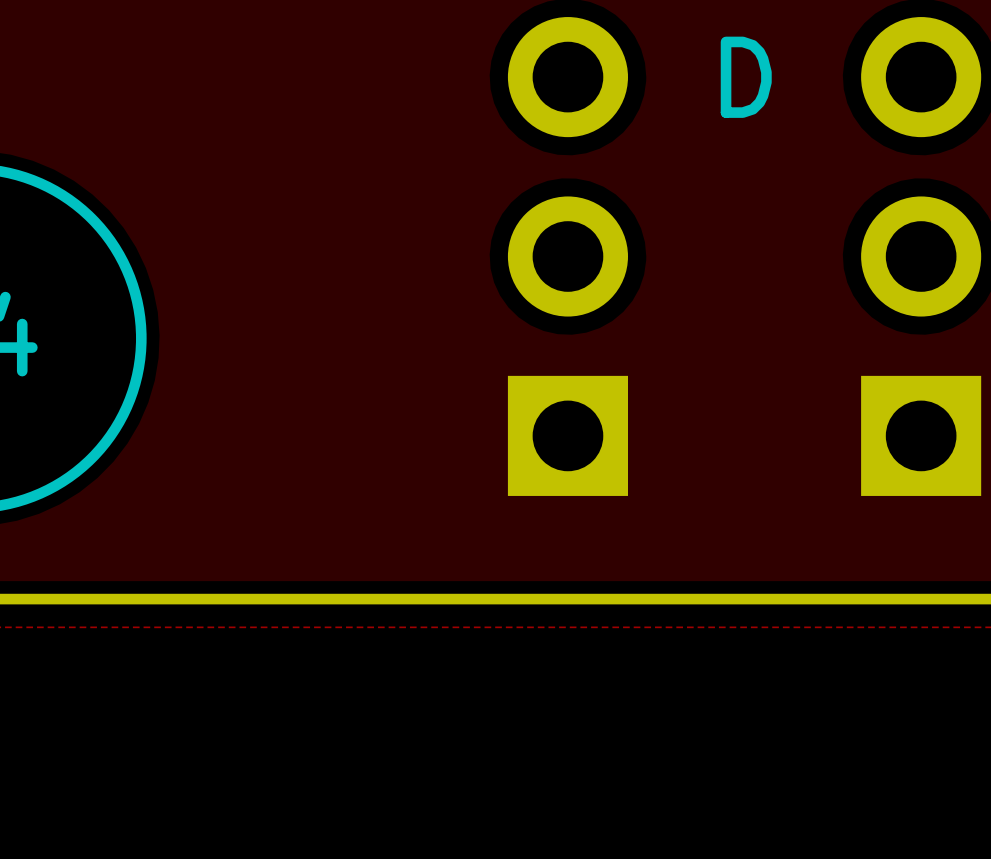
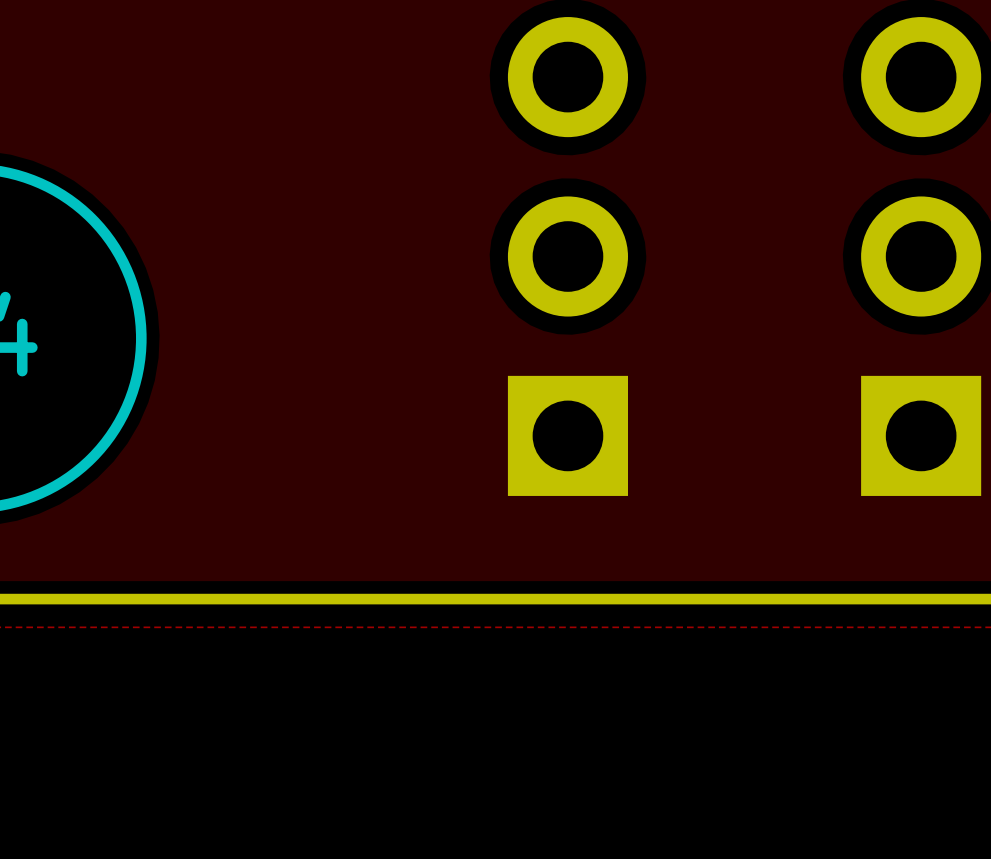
text: D (746, 77) -> none

